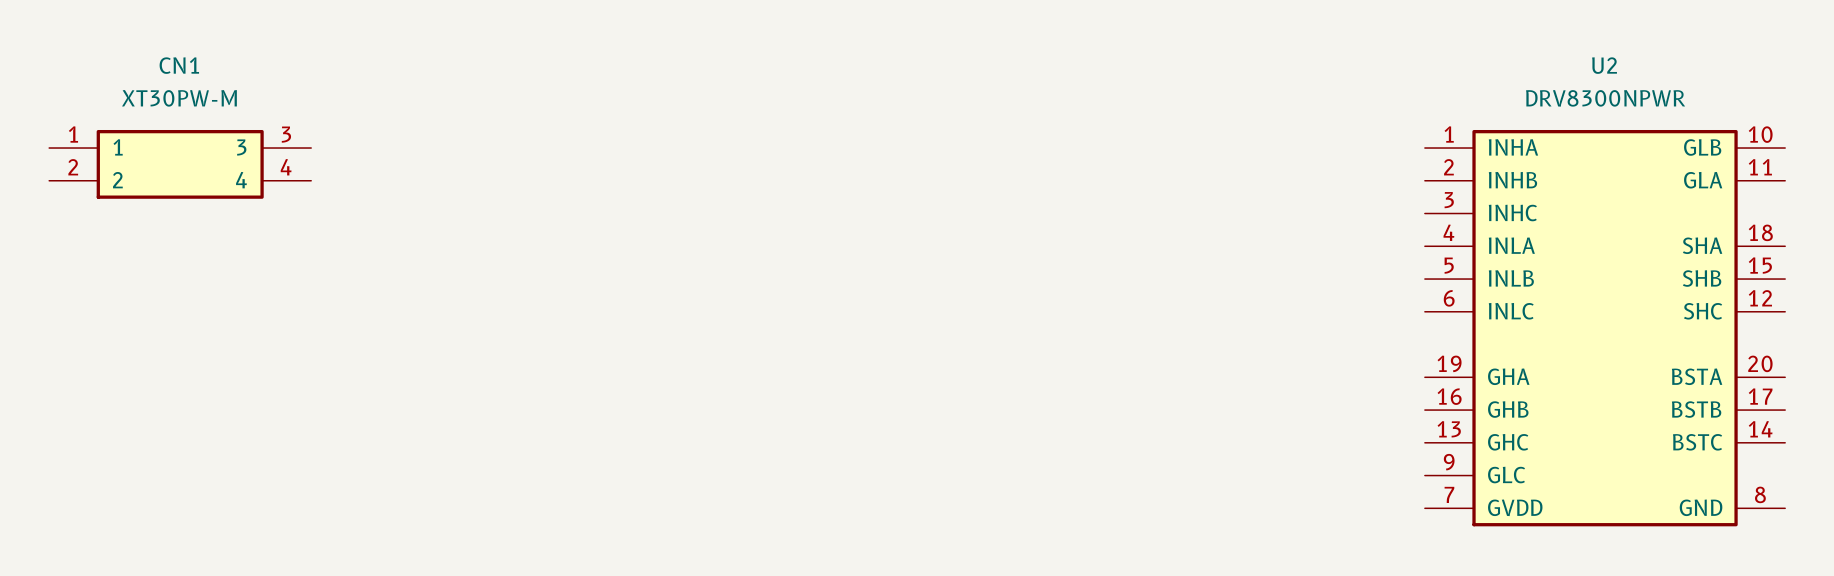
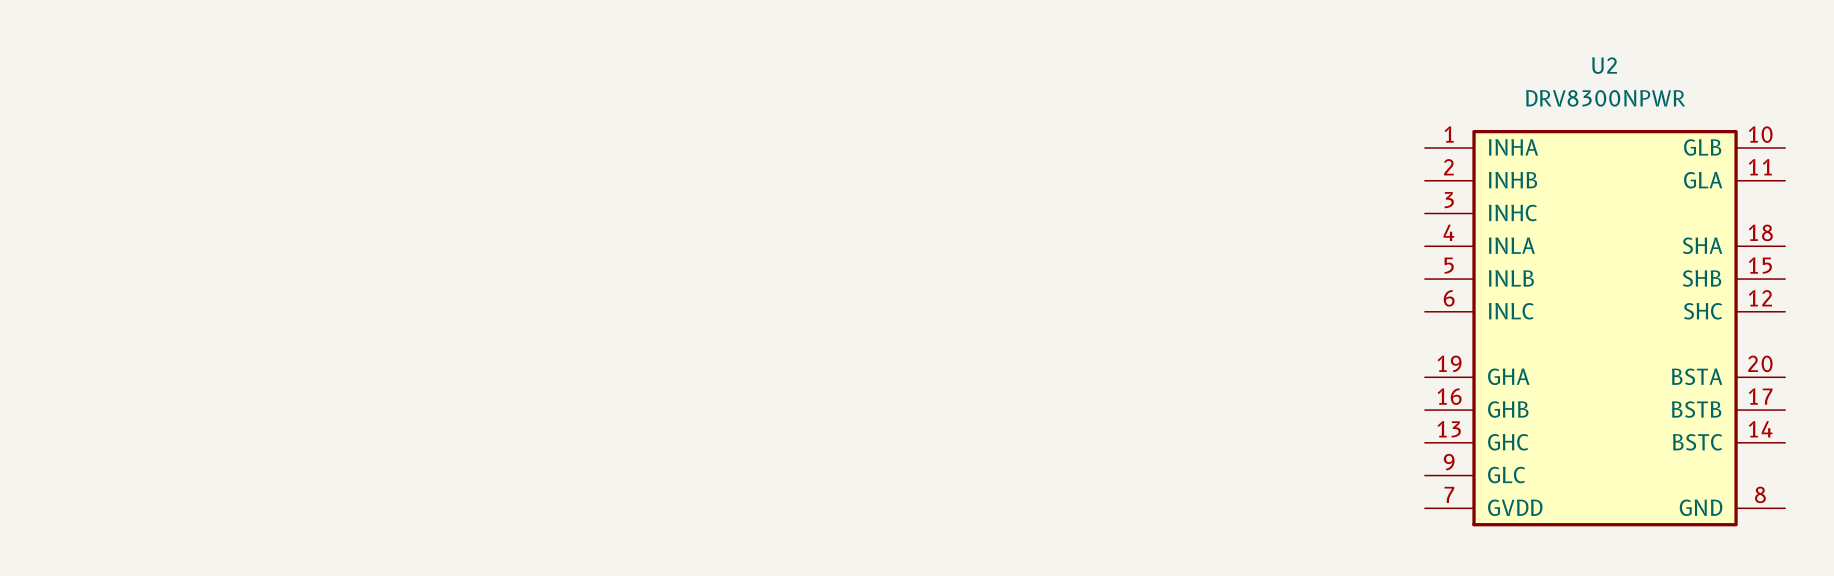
CN1: XT30PW-M (180, 164) -> none

